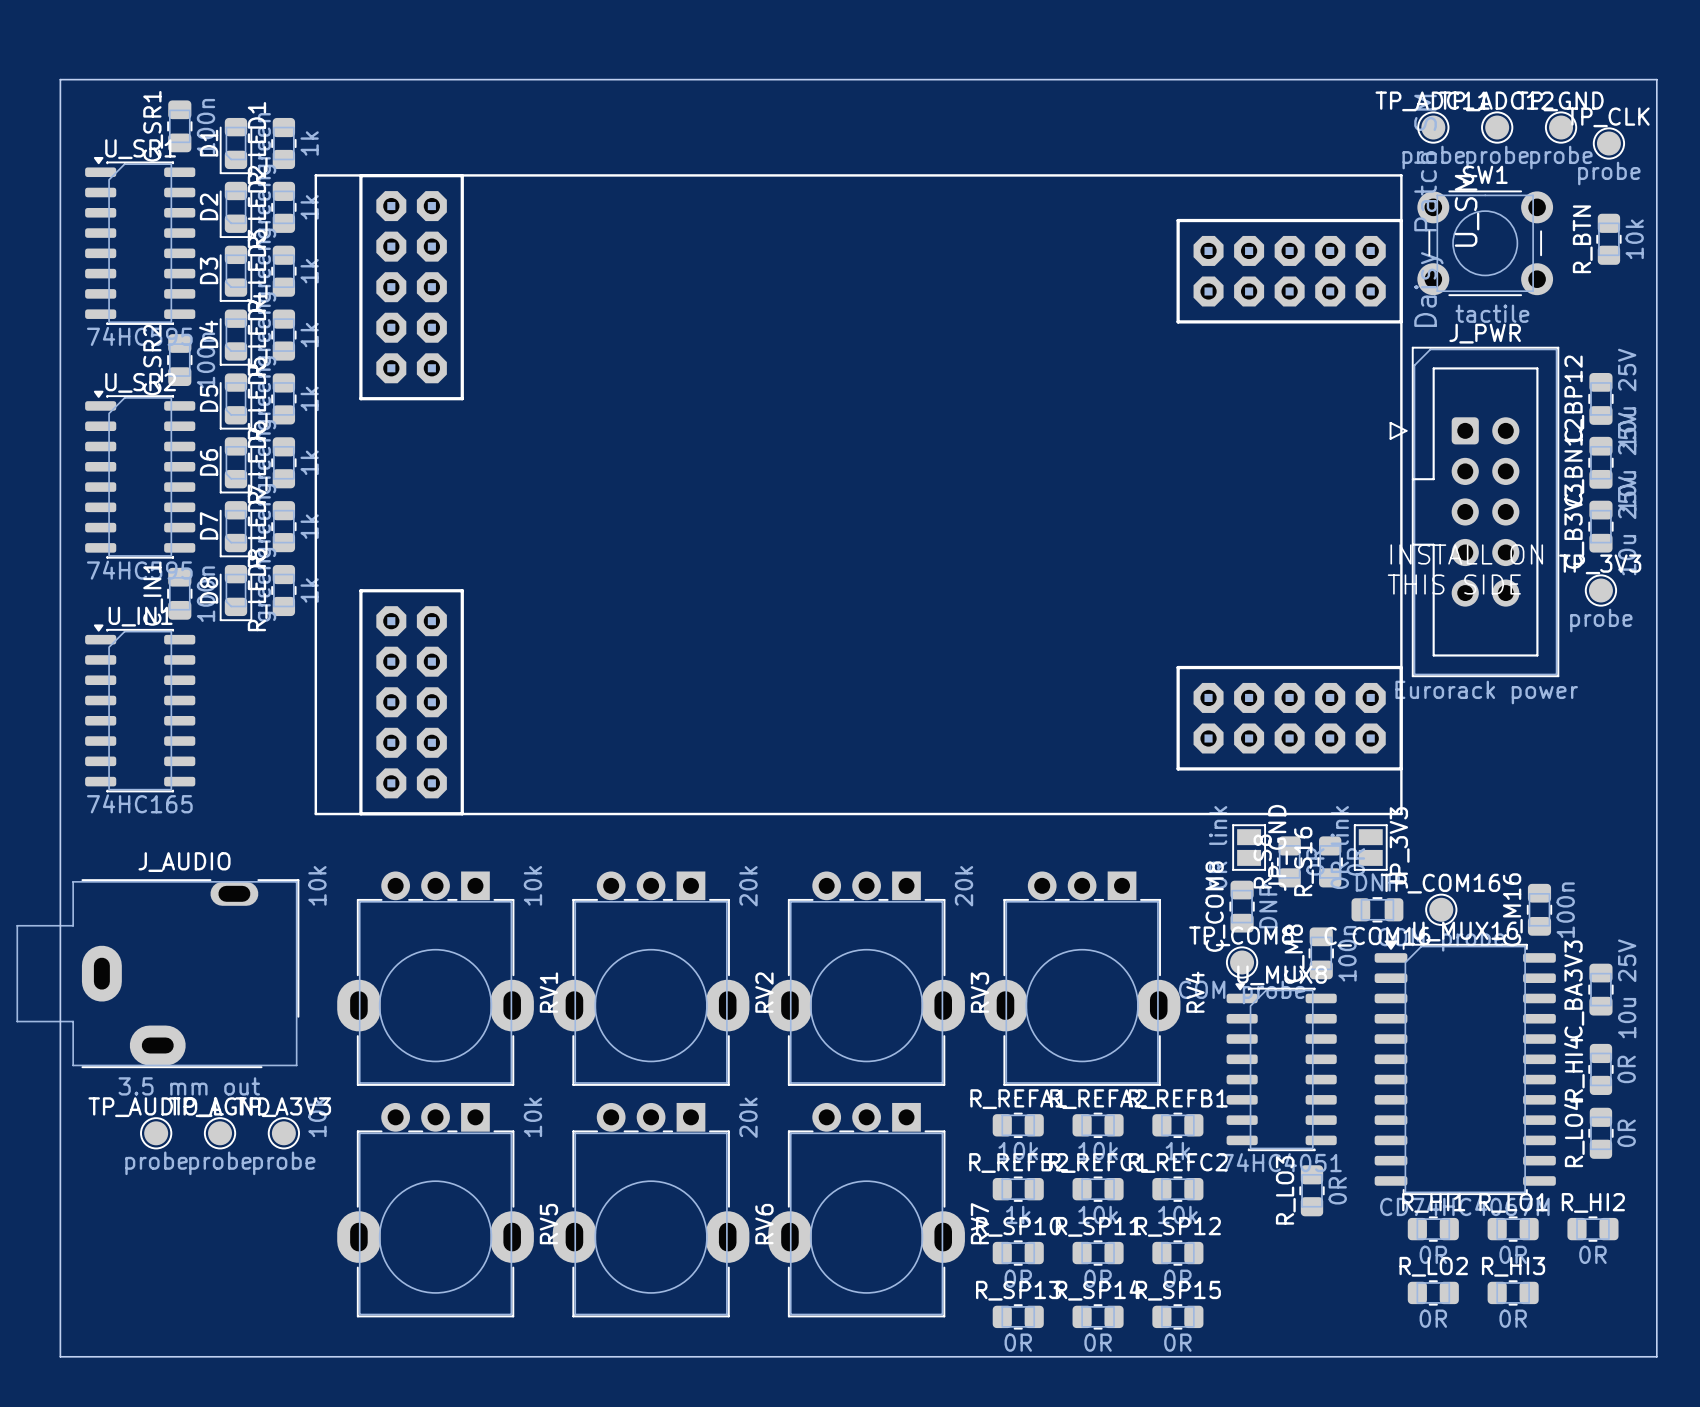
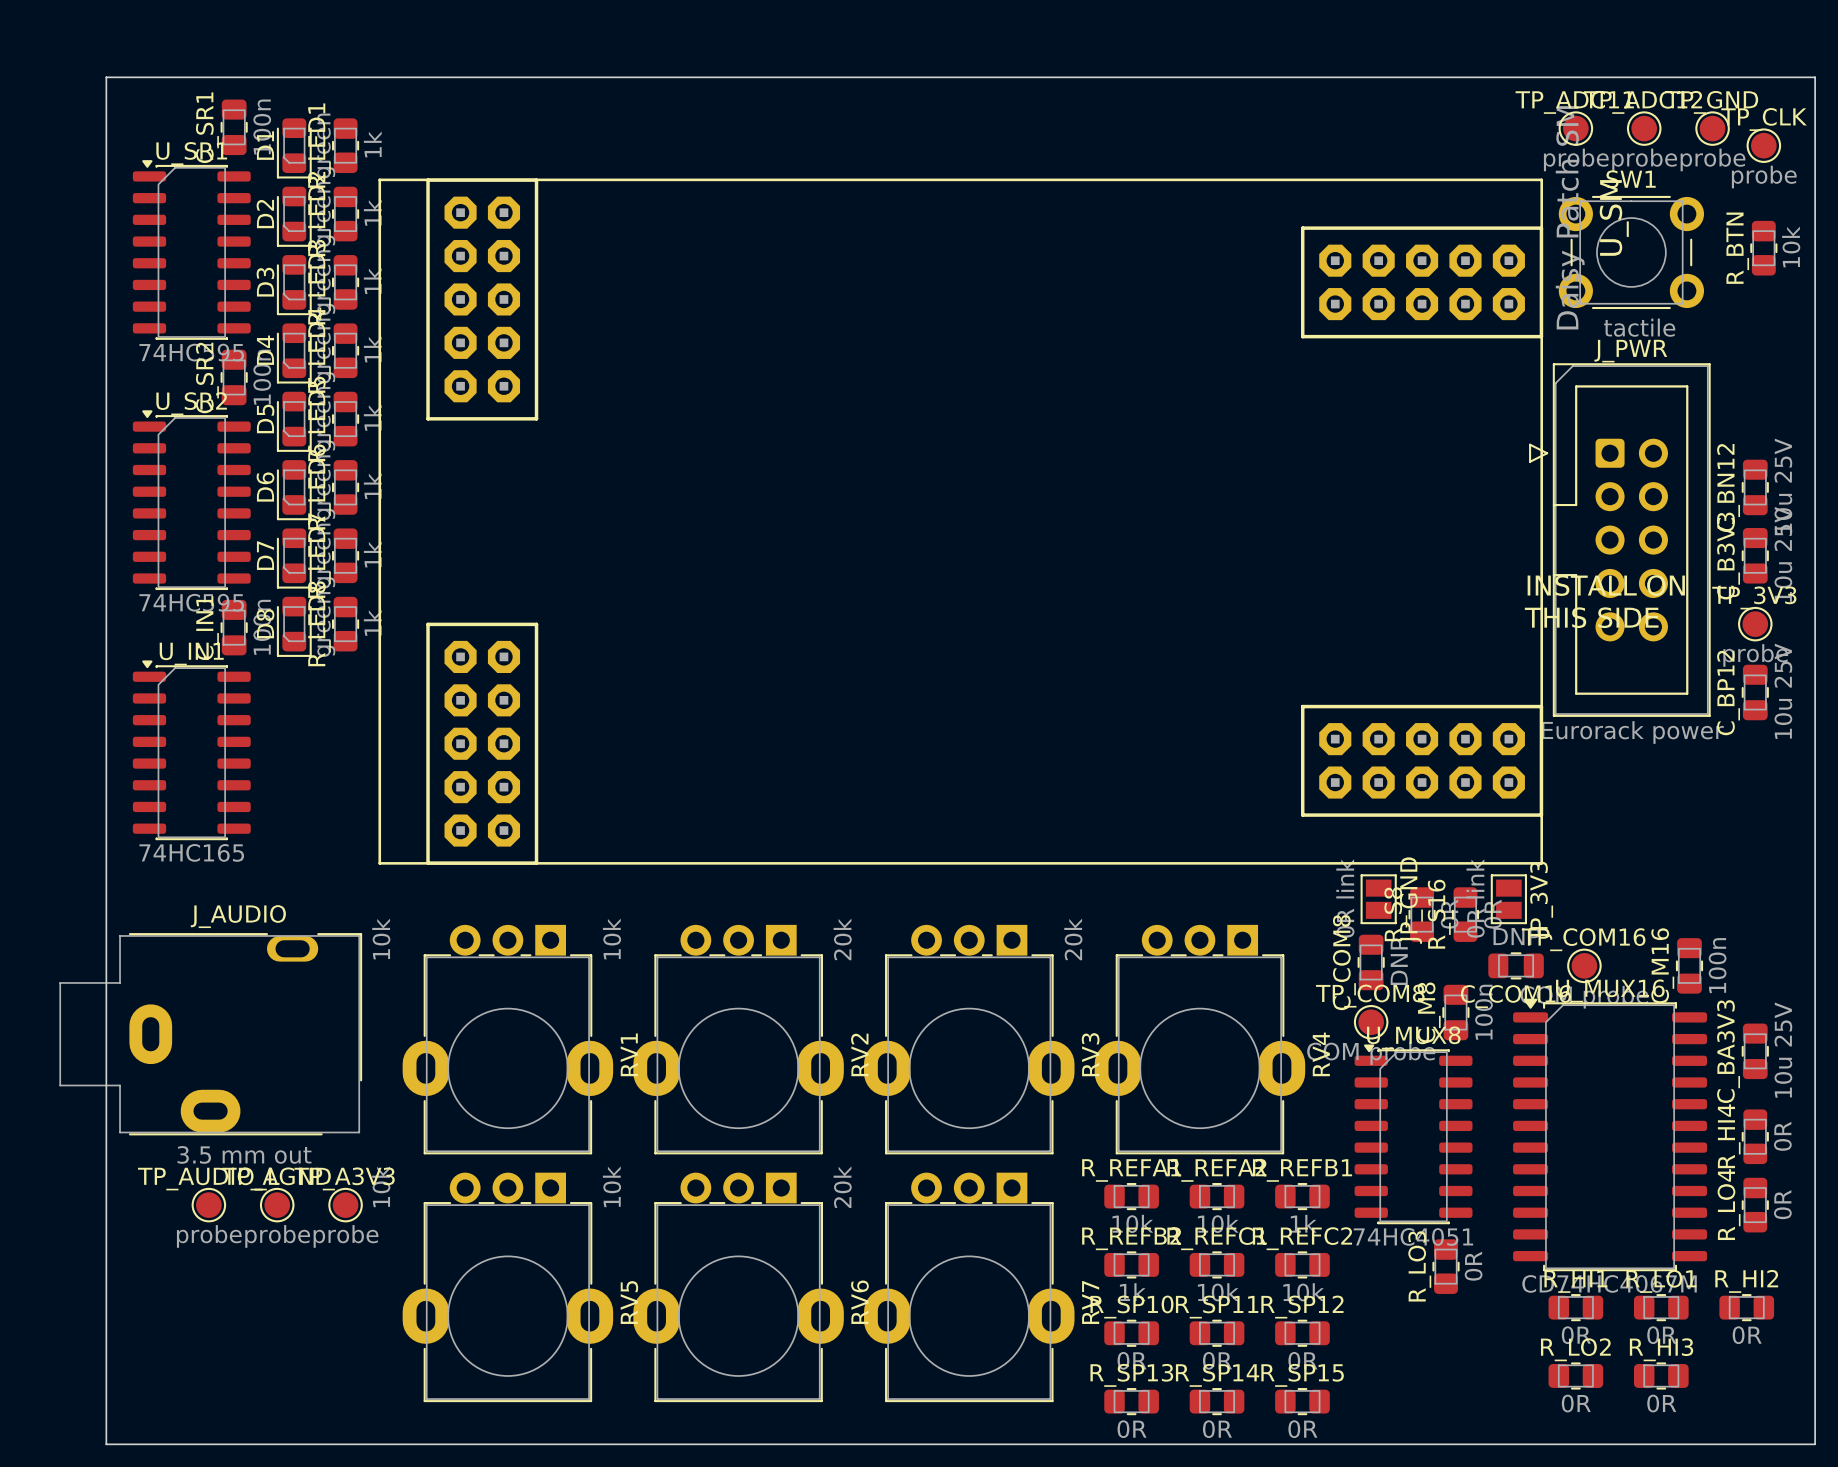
C_BP12 position: (1600, 398) -> (1755, 692)

